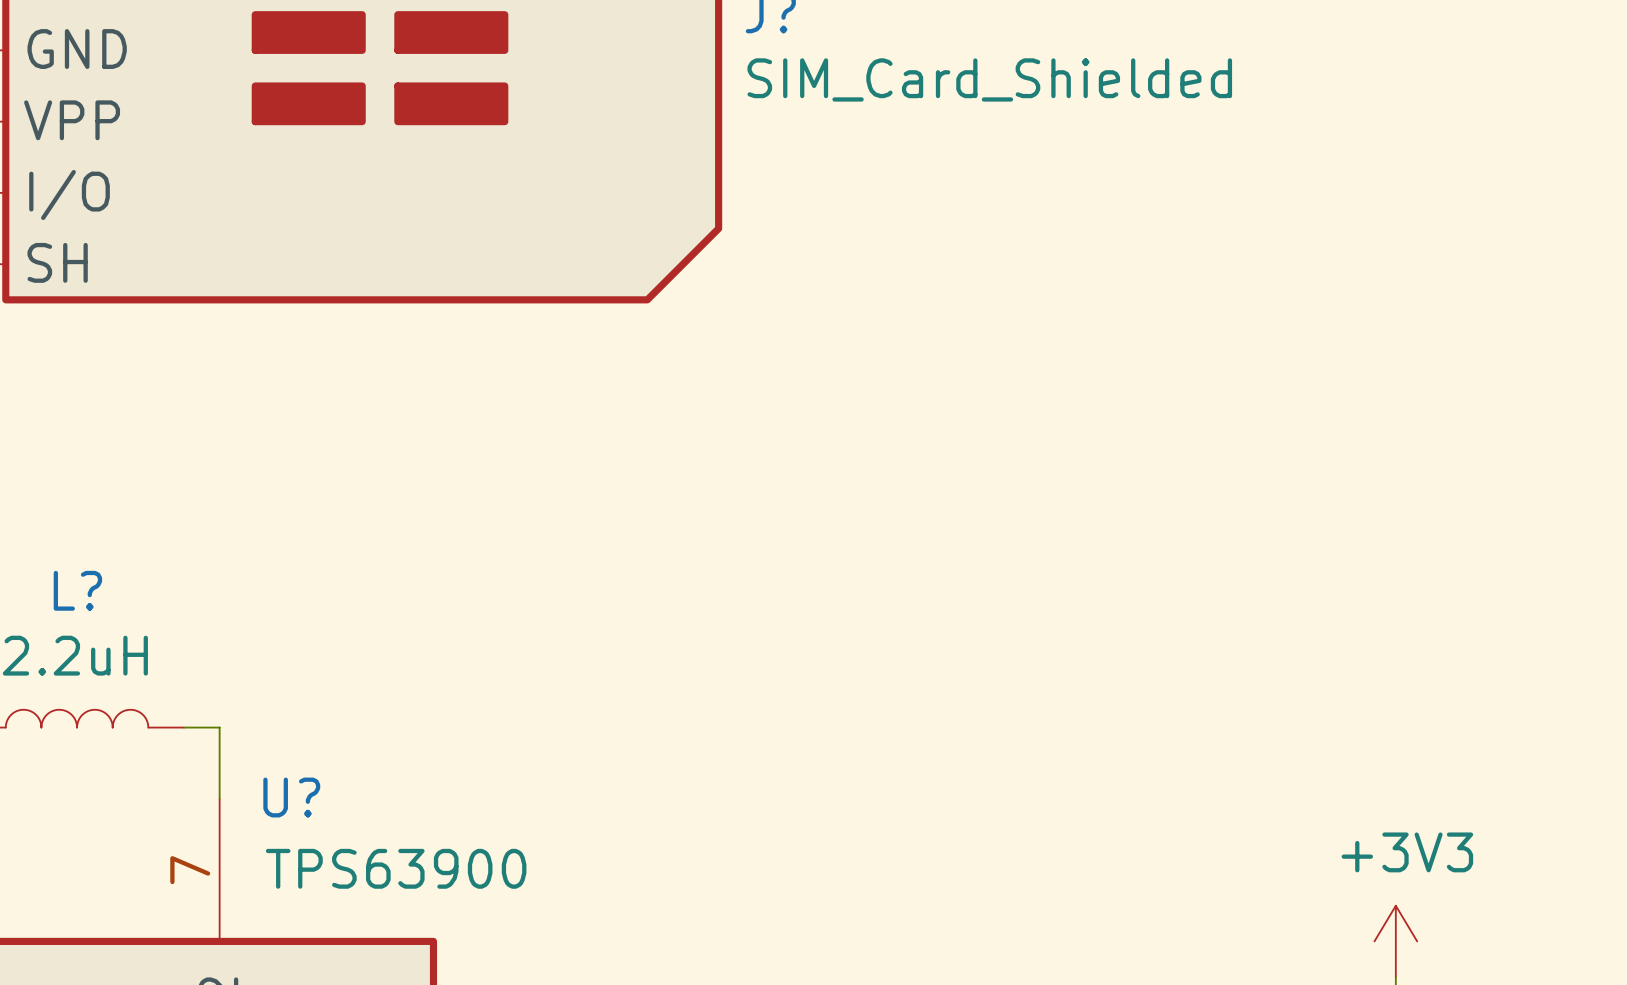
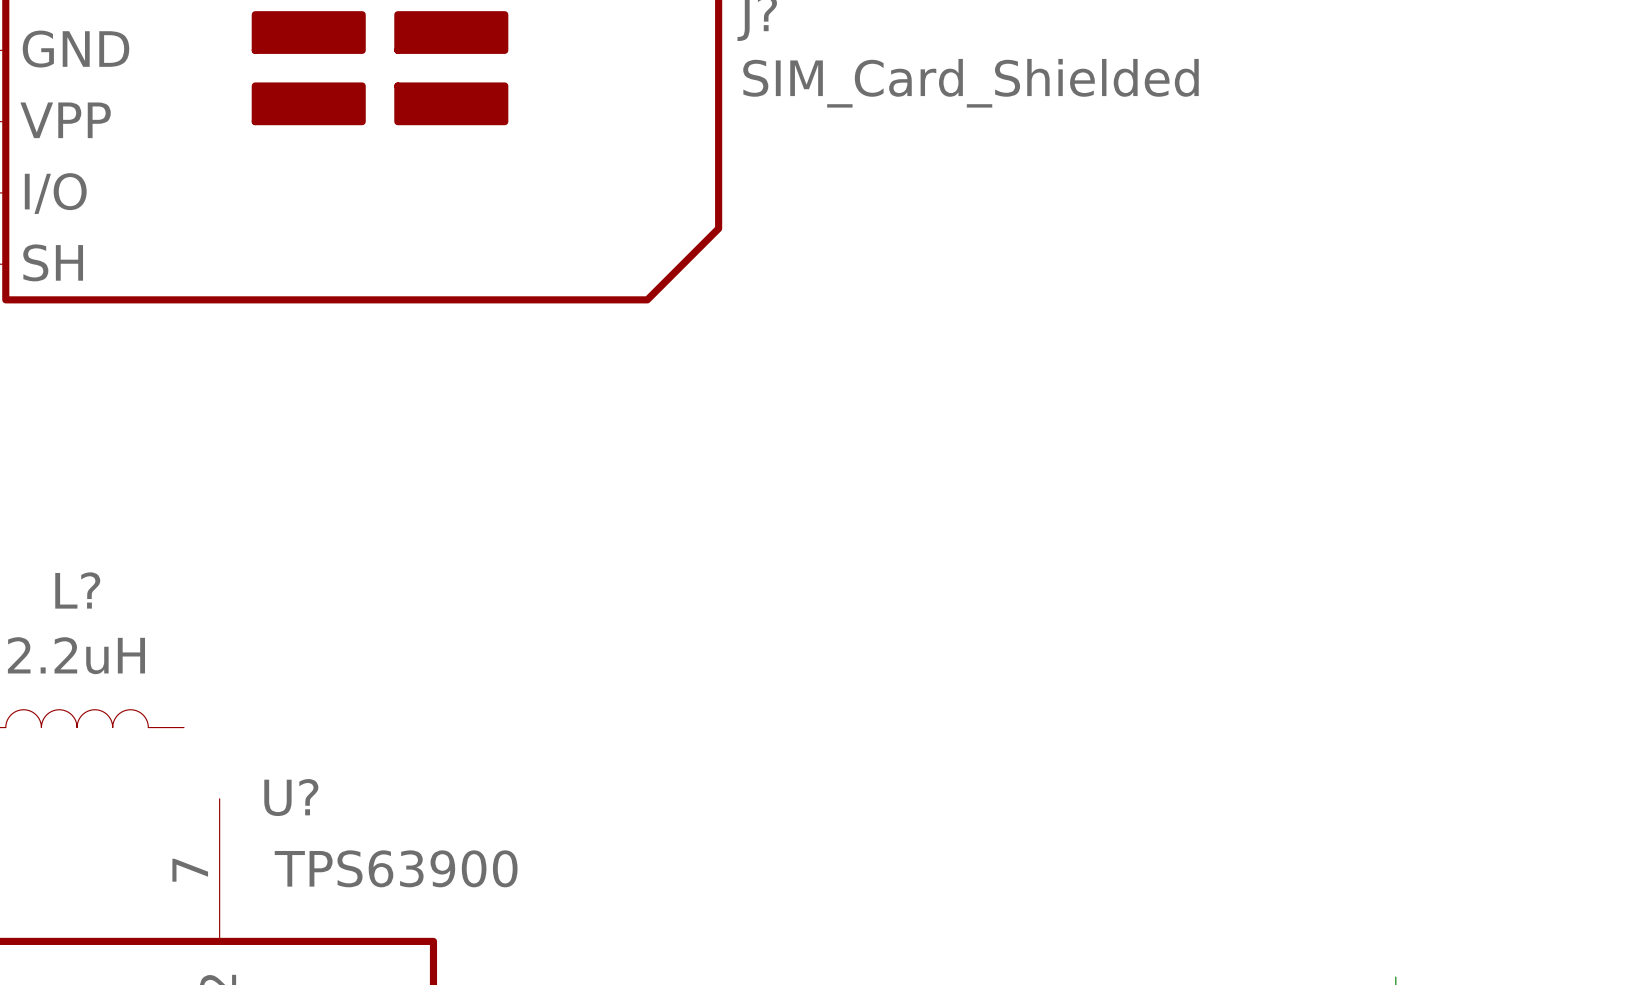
wire: (183, 727) (219, 727) (219, 798) -> none
power symbol: +3V3 (1395, 941) -> none

